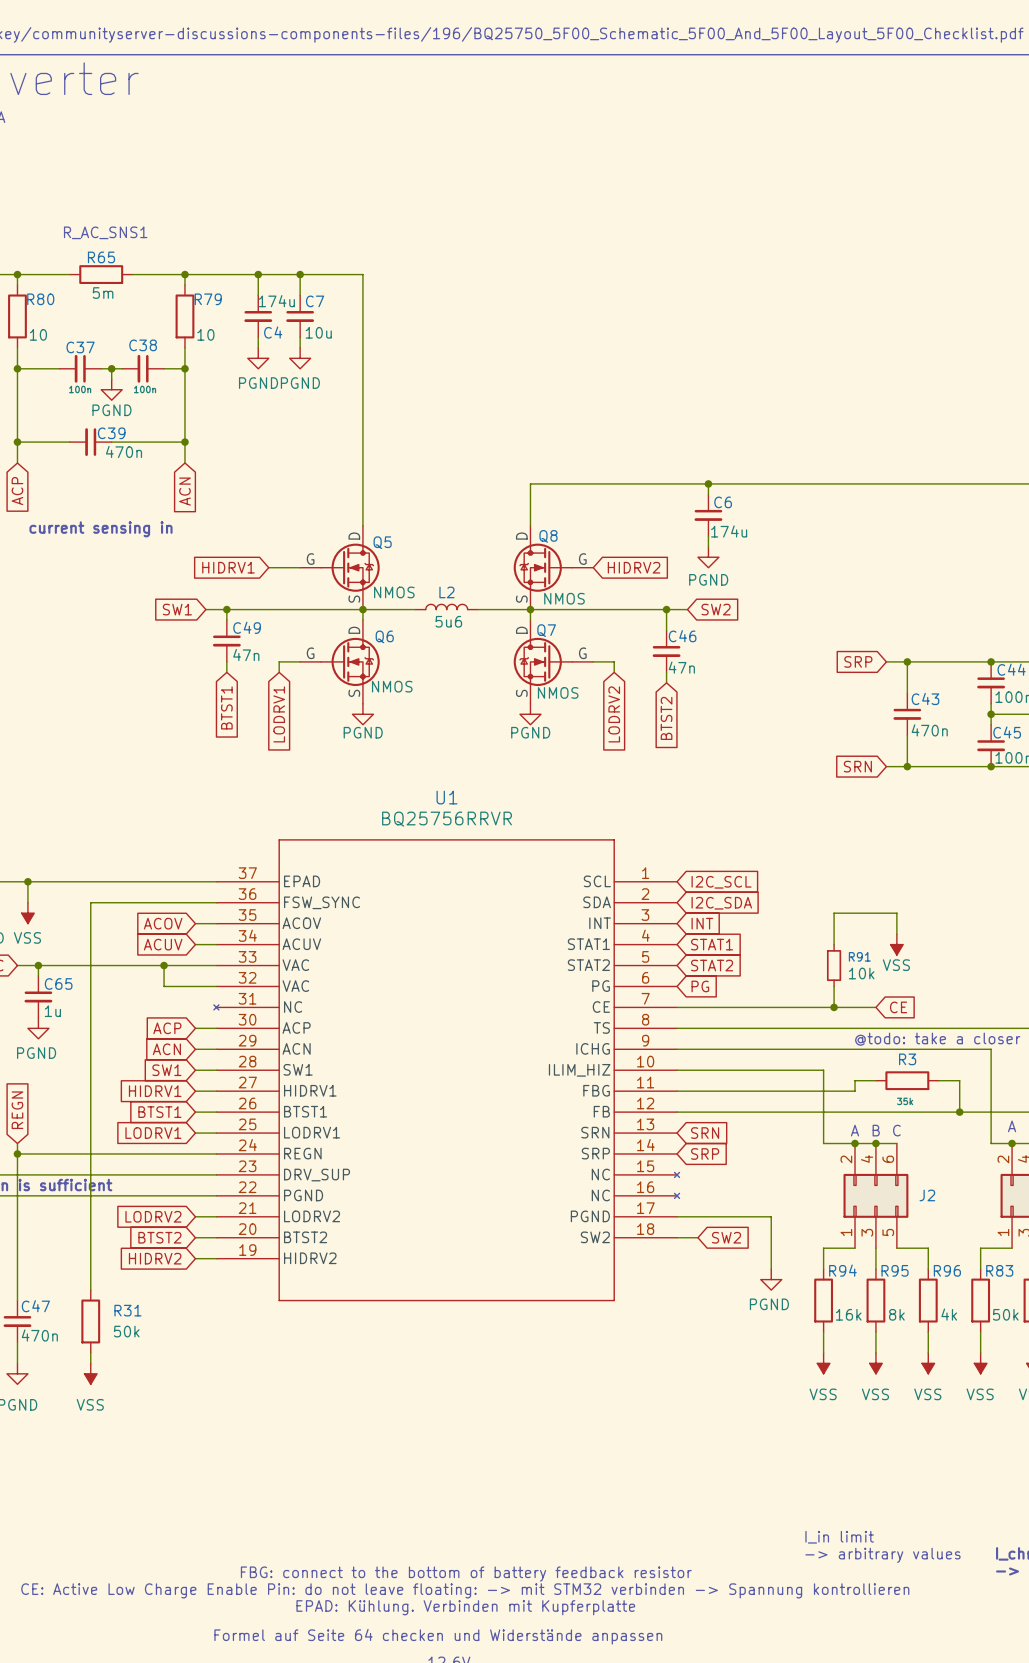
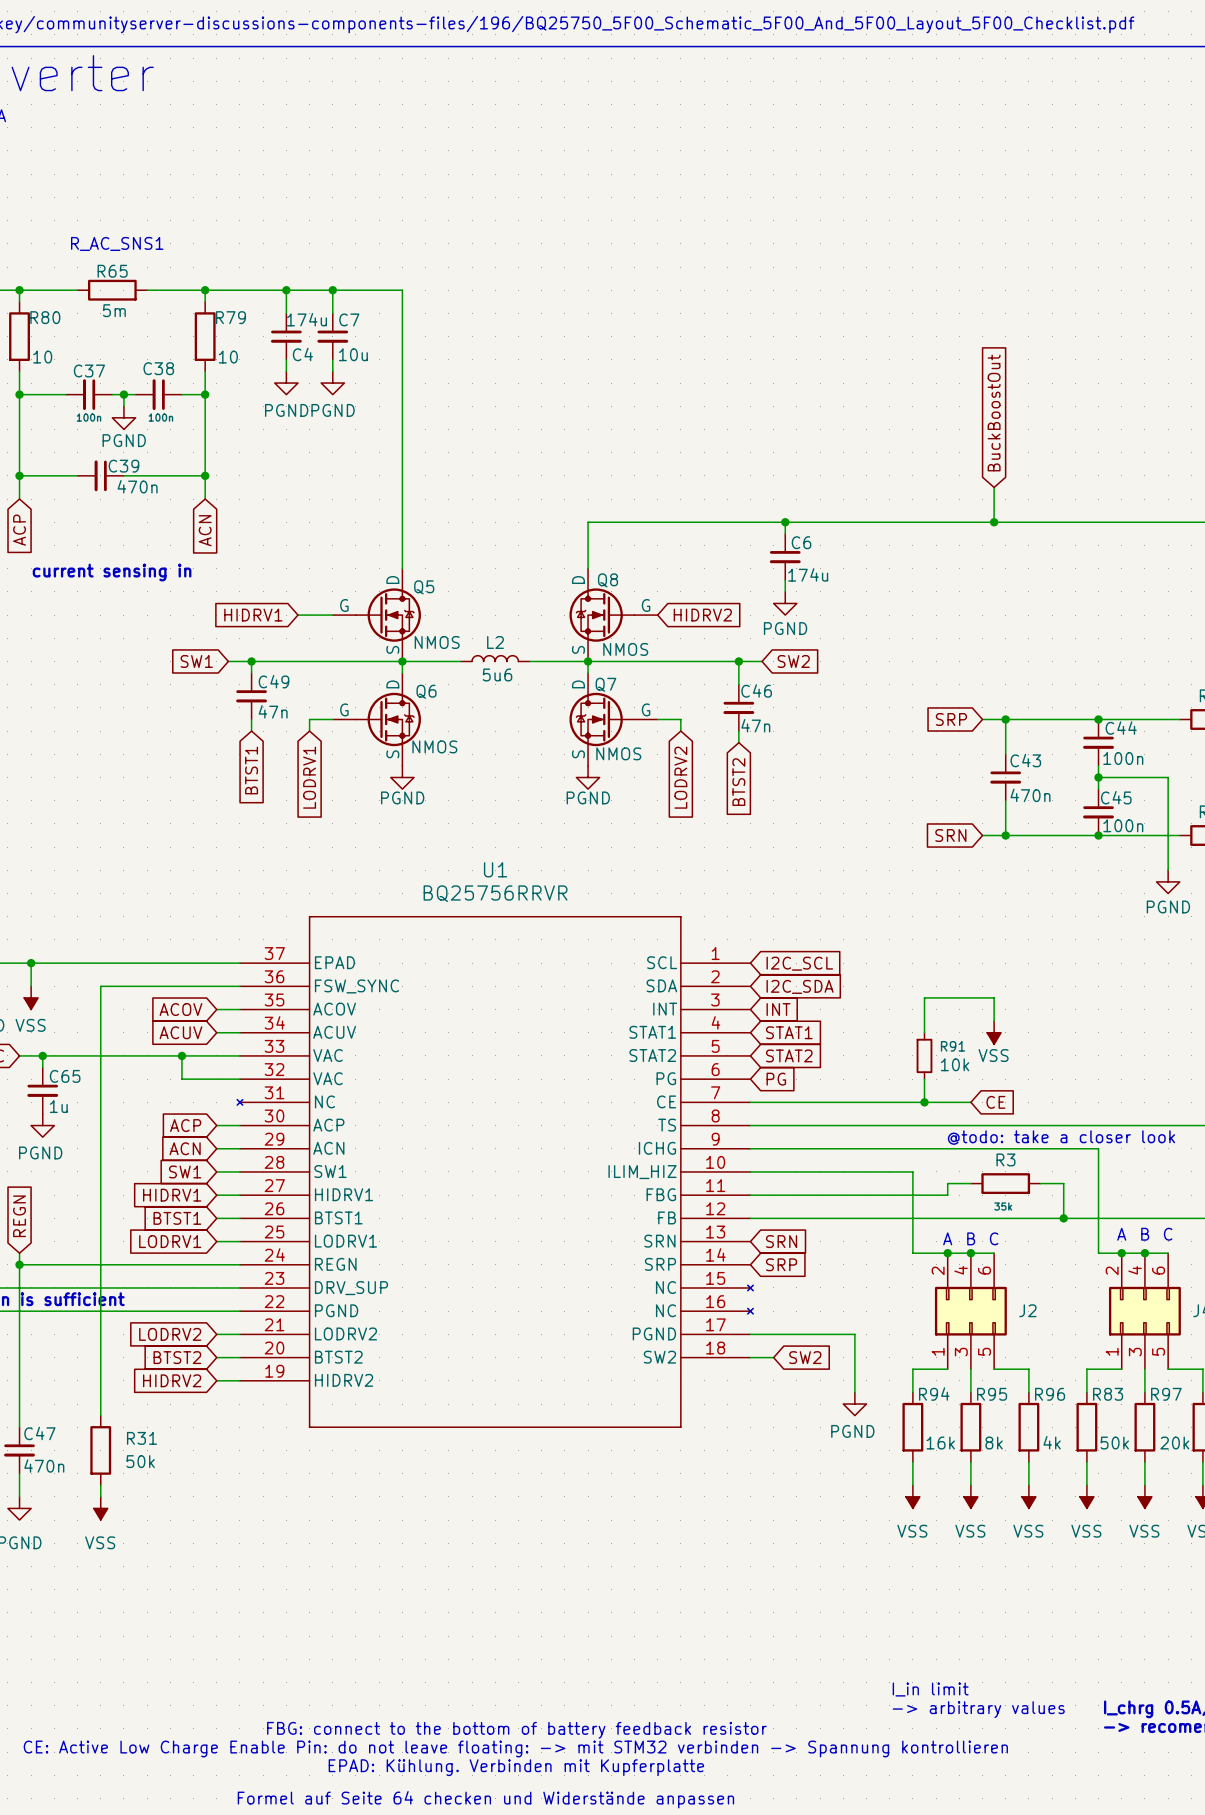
global label: none -> BuckBoostOut (994, 412)
wire: none -> (994, 487) (994, 522)
junction: none -> (994, 522)

